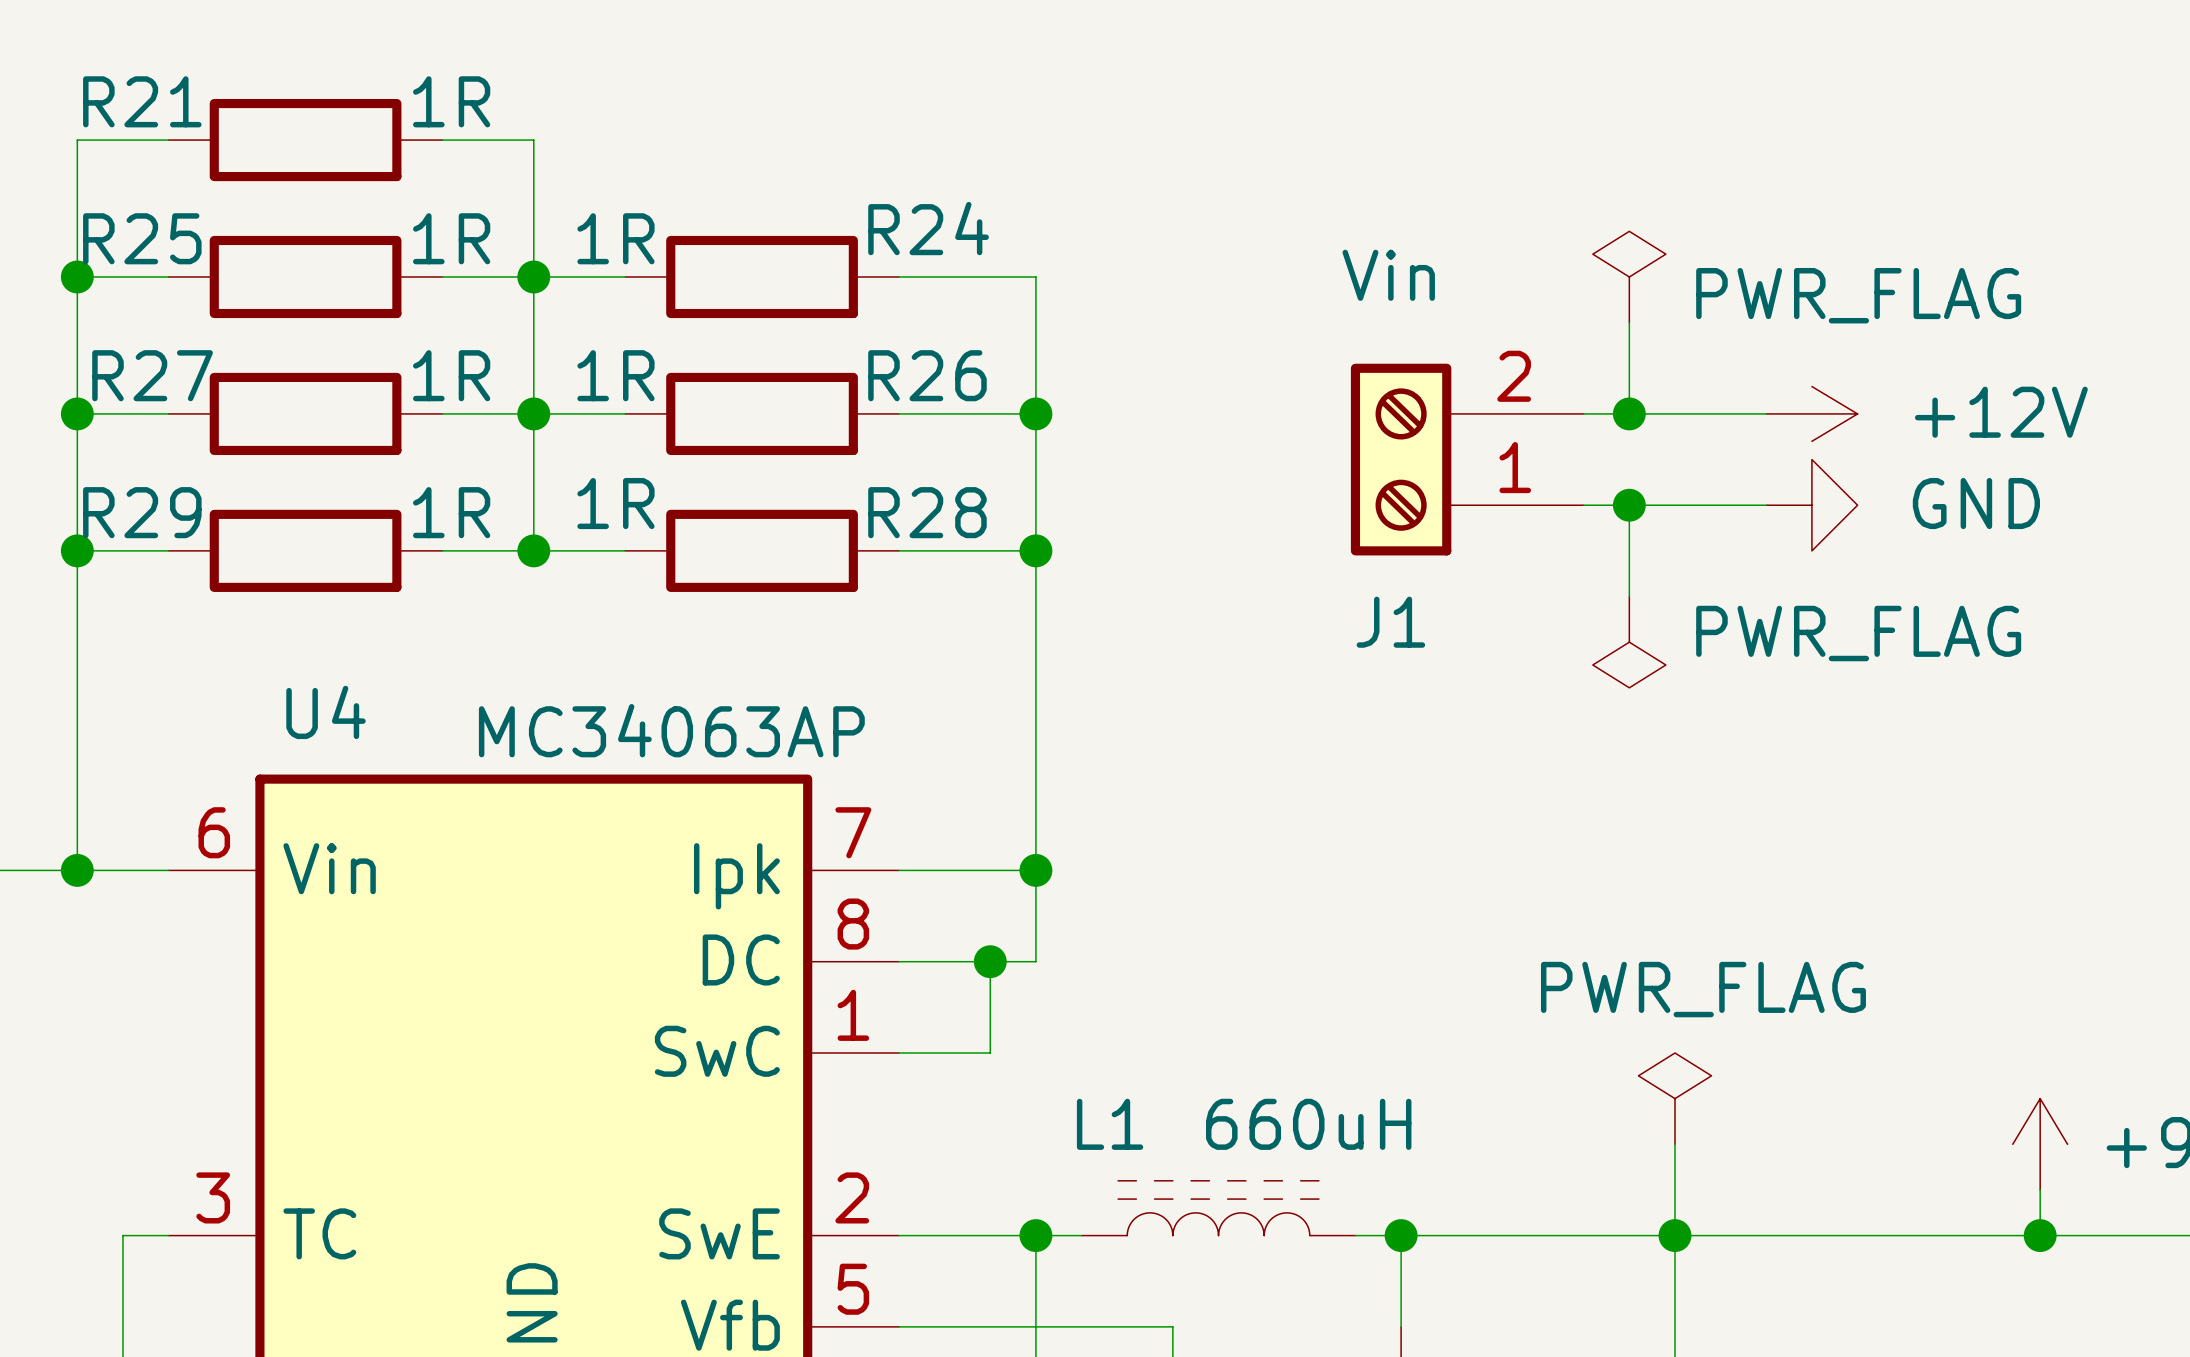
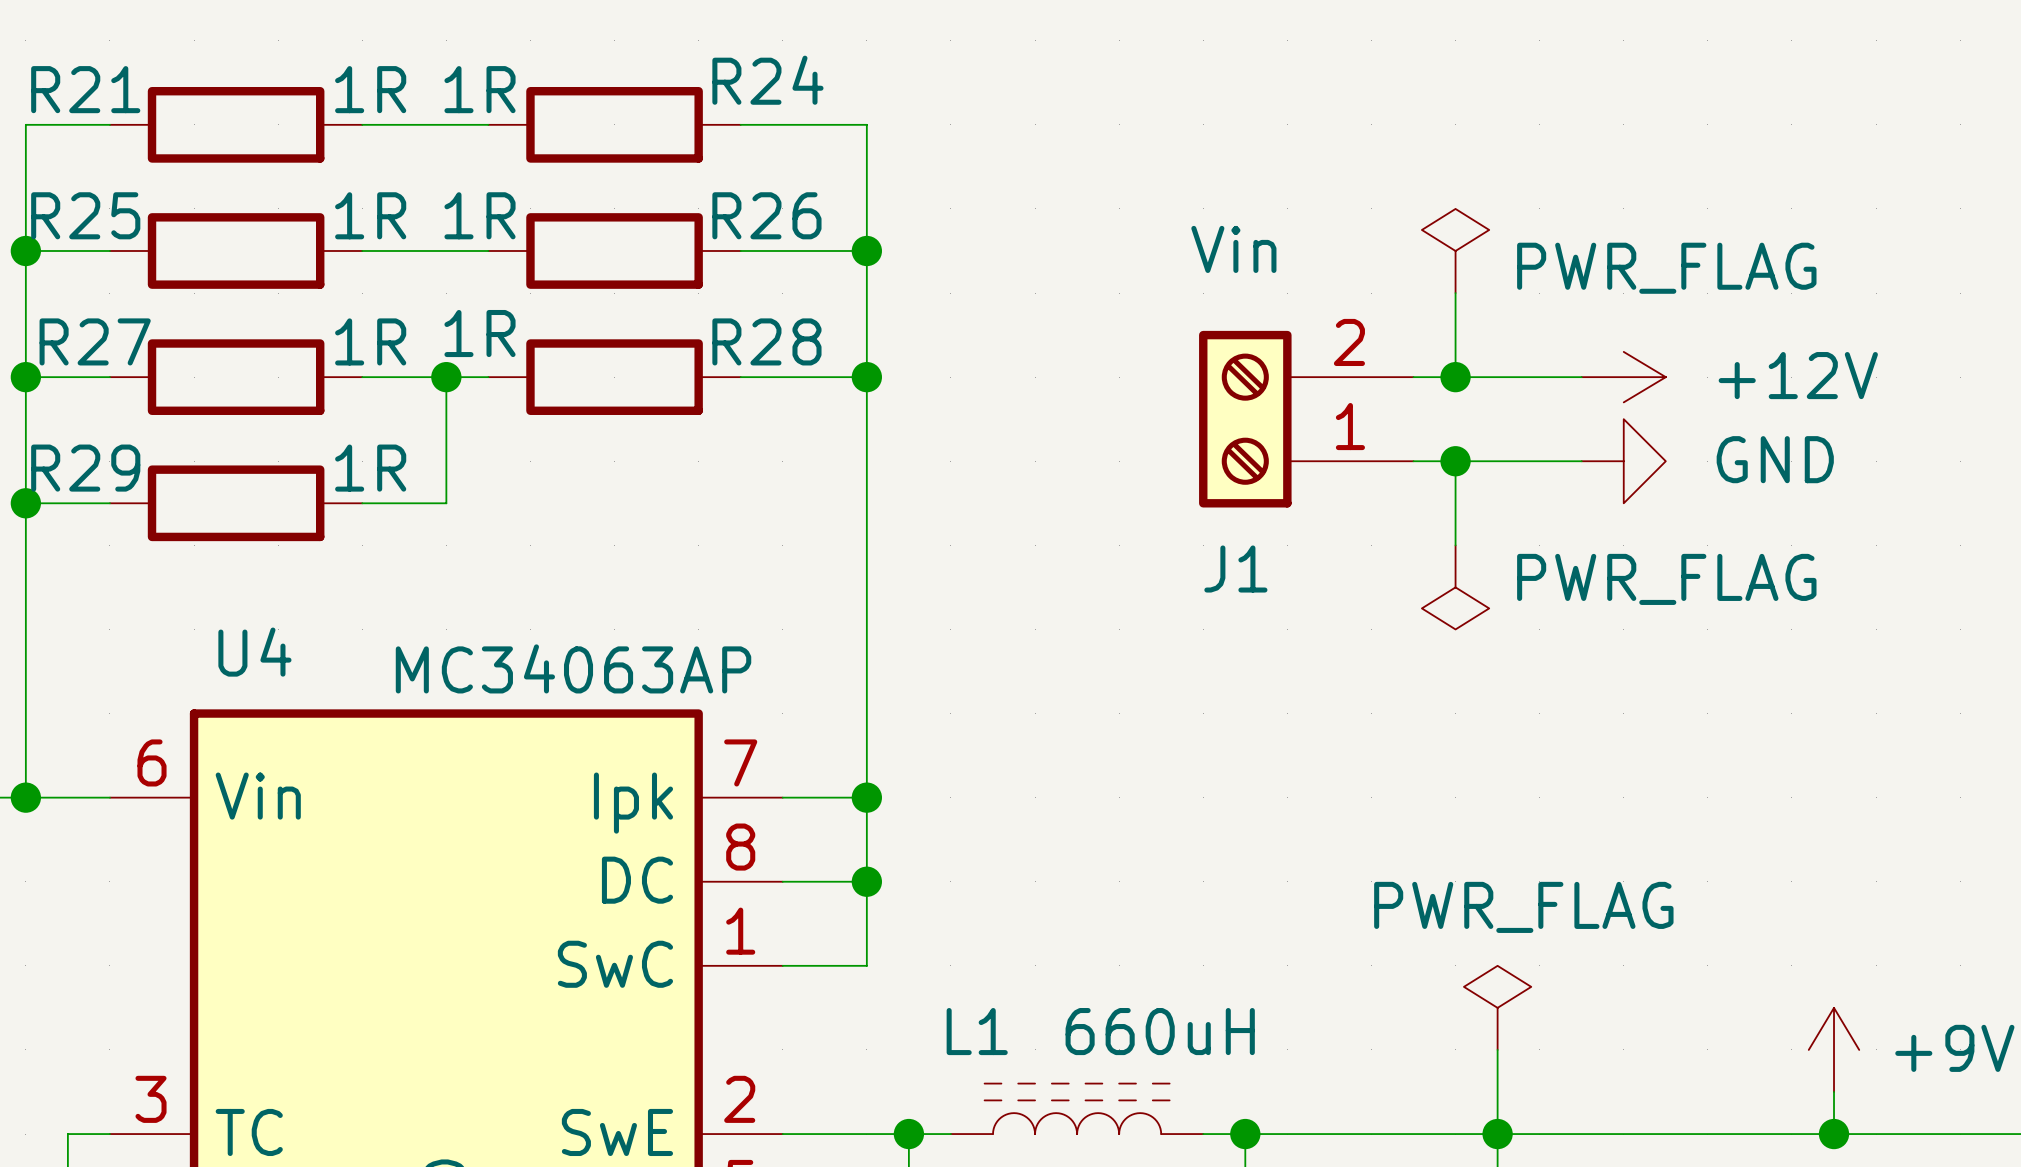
wire: (533, 140) (533, 413) -> (446, 124) (488, 124)
junction: (533, 276) -> none
R24 position: (762, 276) -> (614, 124)
wire: (990, 276) (1035, 276) (1035, 961) (990, 961) -> (740, 124) (866, 124) (866, 881)
junction: none -> (866, 250)
R26 position: (762, 413) -> (614, 250)
wire: (990, 413) (1035, 413) -> none
junction position: (1035, 413) -> (866, 377)
wire: (533, 550) (625, 550) -> none
junction: (533, 550) -> none
R28 position: (762, 550) -> (614, 377)
wire: (898, 550) (1035, 550) -> none
junction: (1035, 550) -> none
wire: (990, 870) (1035, 870) -> none
junction position: (1035, 870) -> (866, 797)

